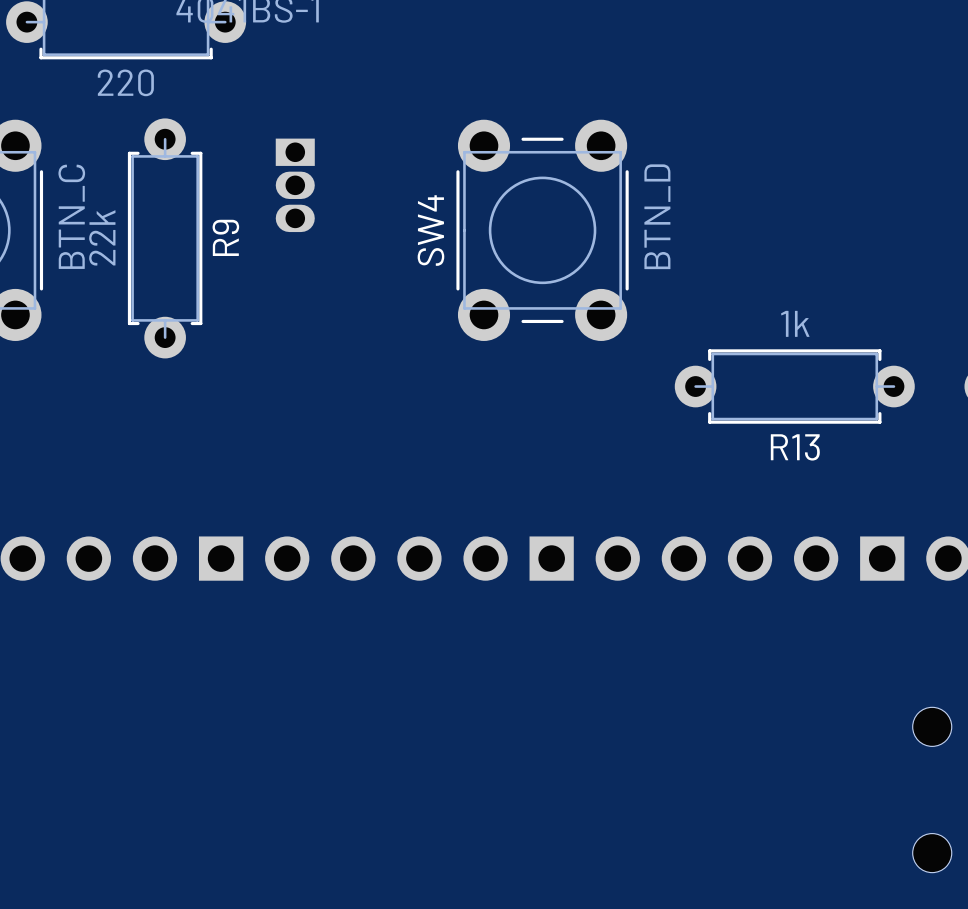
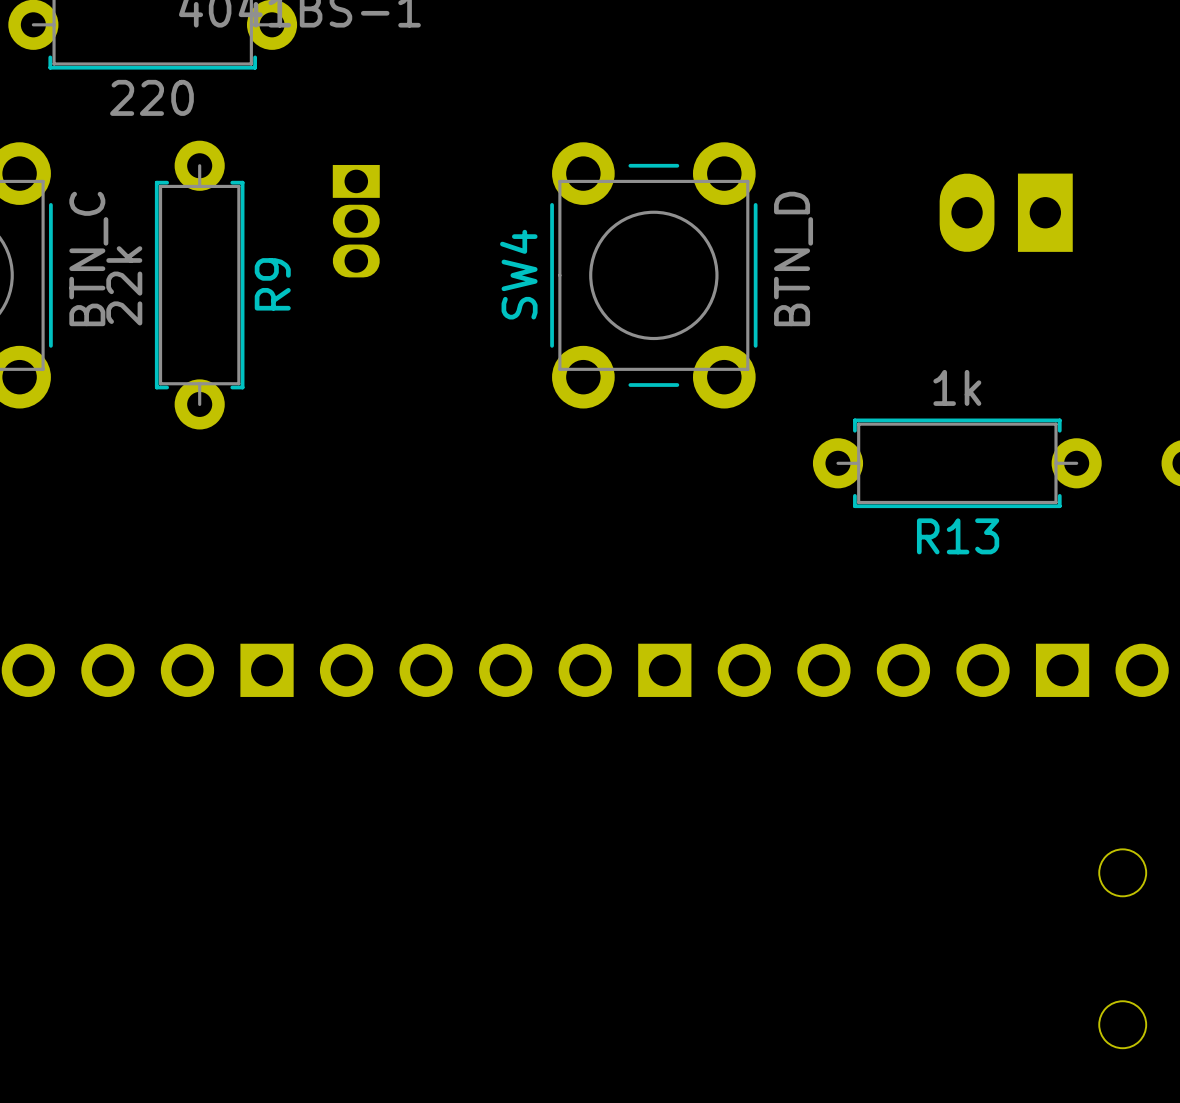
part: none -> (1006, 212)

